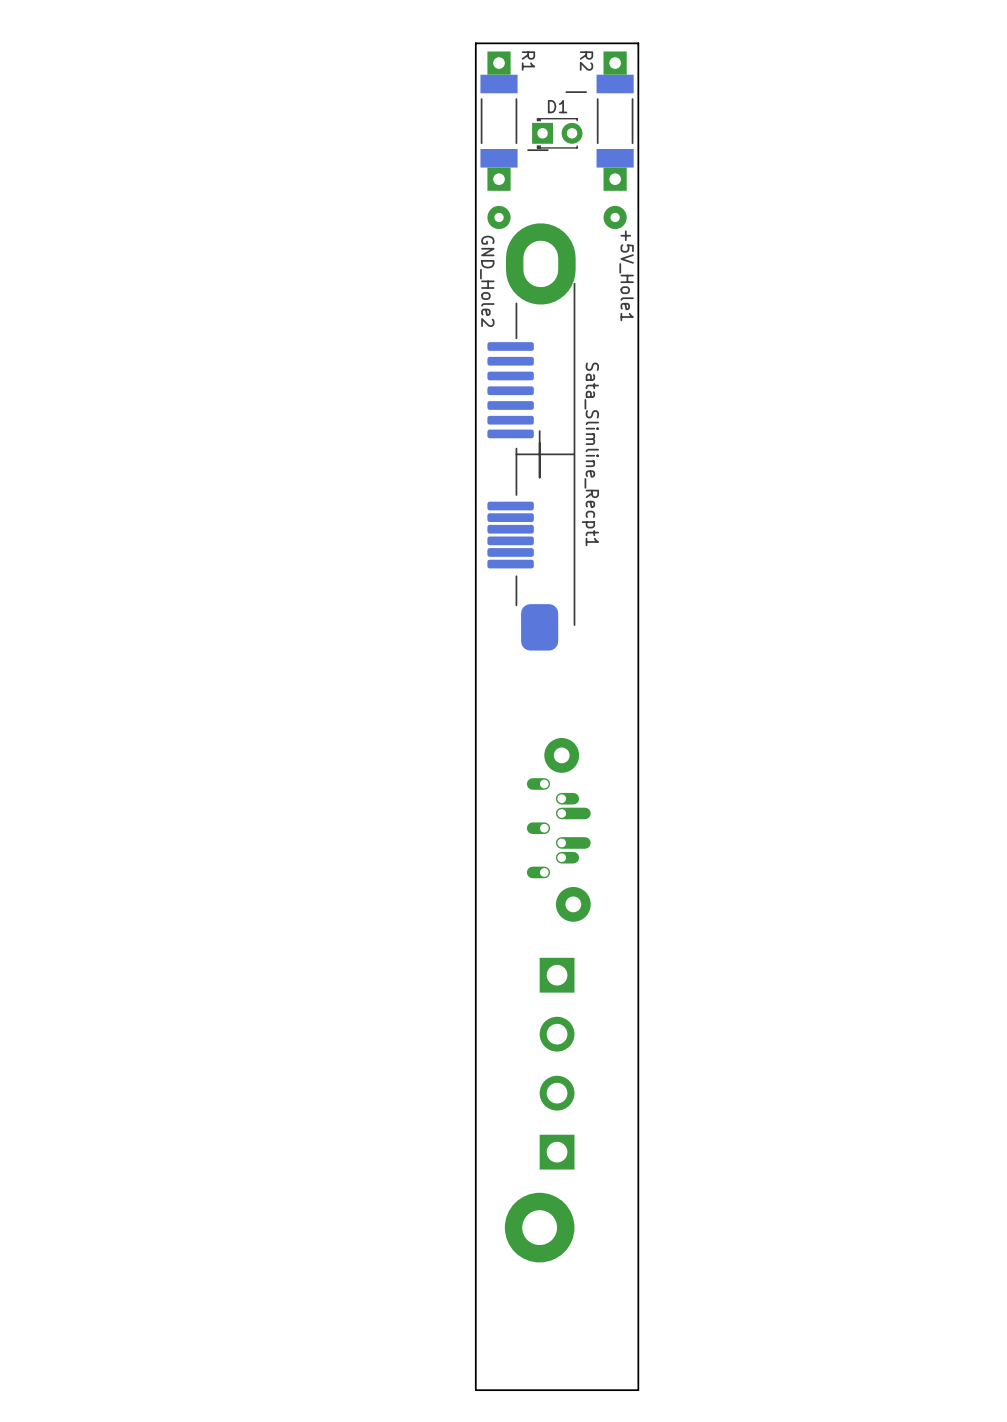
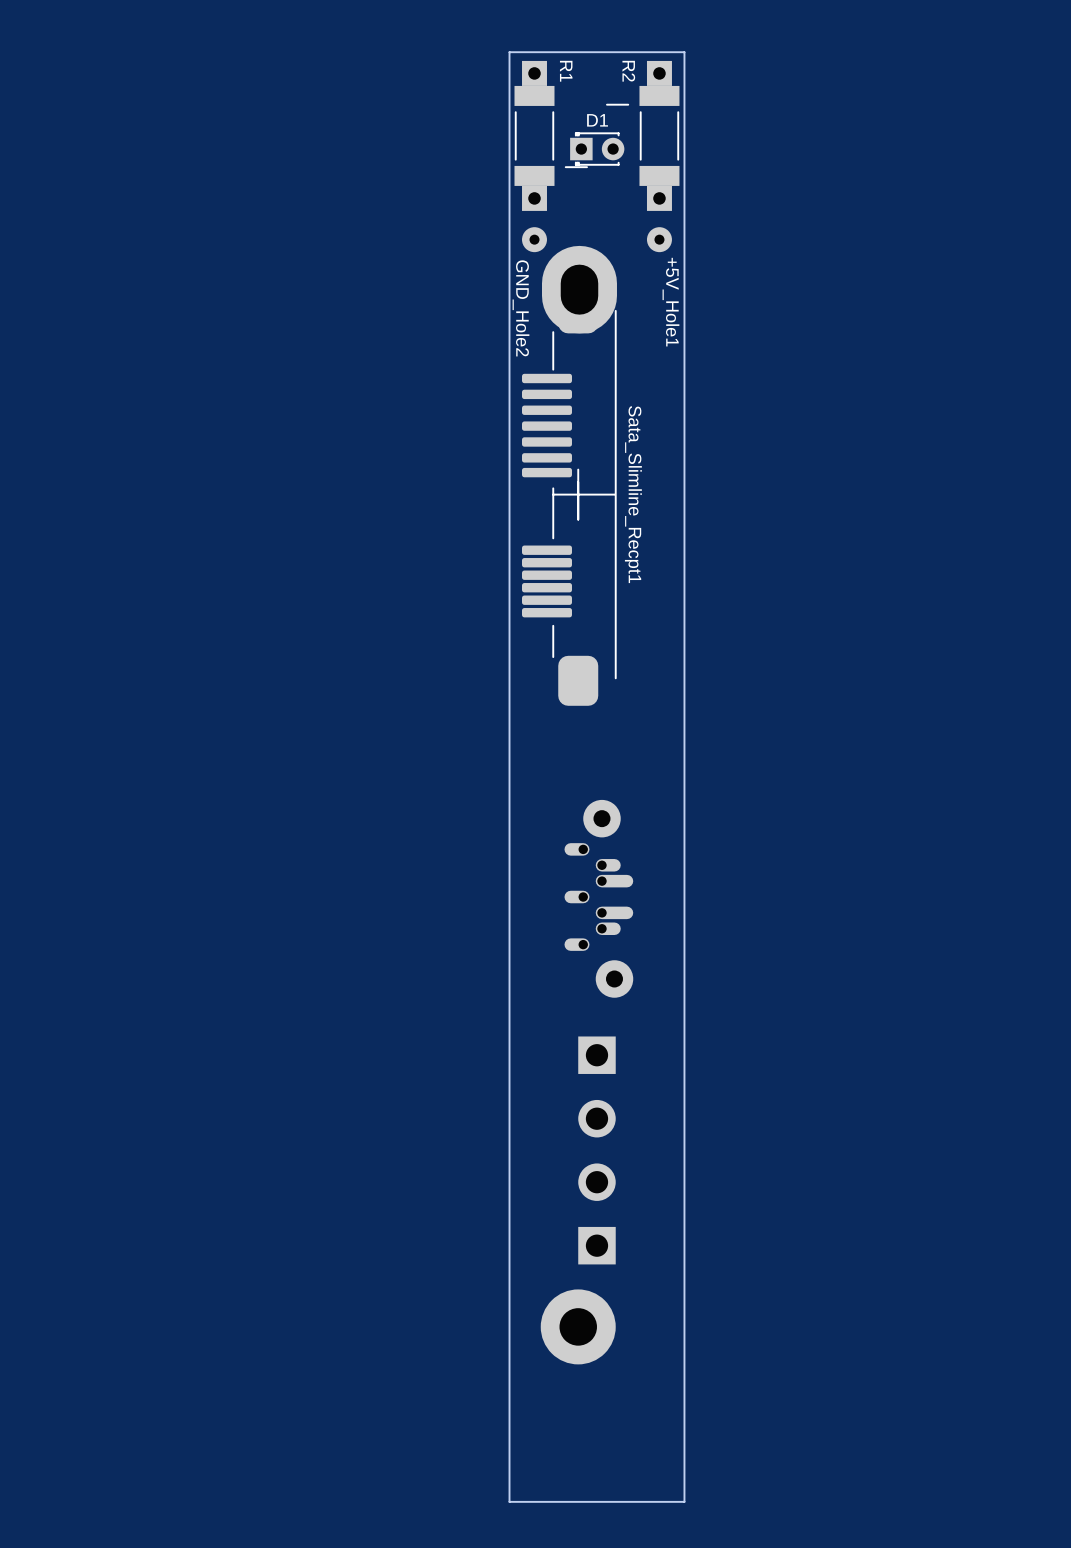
Sata_Slimline_Recpt1 footprint: [487, 269, 576, 651] -> [522, 283, 617, 706]

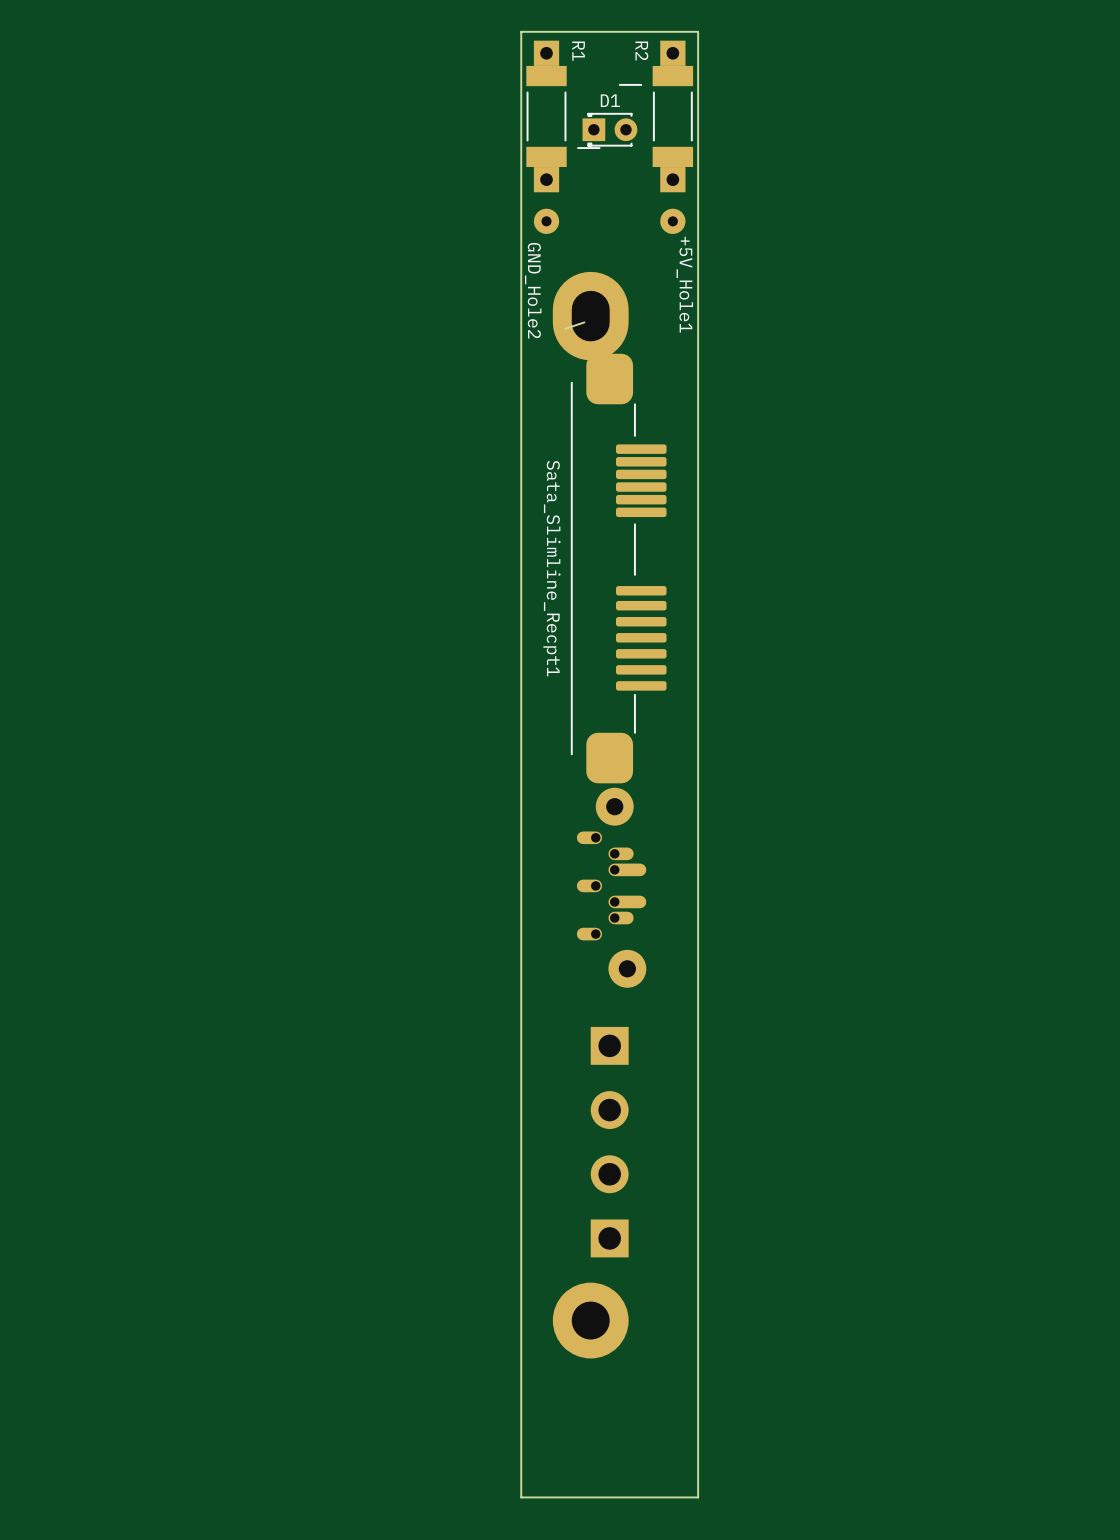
Sata_Slimline_Recpt1 footprint: [522, 283, 617, 706] -> [570, 353, 667, 784]
part position: (579, 289) -> (590, 316)
board edge: none -> (584, 322) (565, 328)
Sata_Slimline_Recpt1 name position: Sata_Slimline_Recpt1 (633, 494) -> Sata_Slimline_Recpt1 (551, 568)

